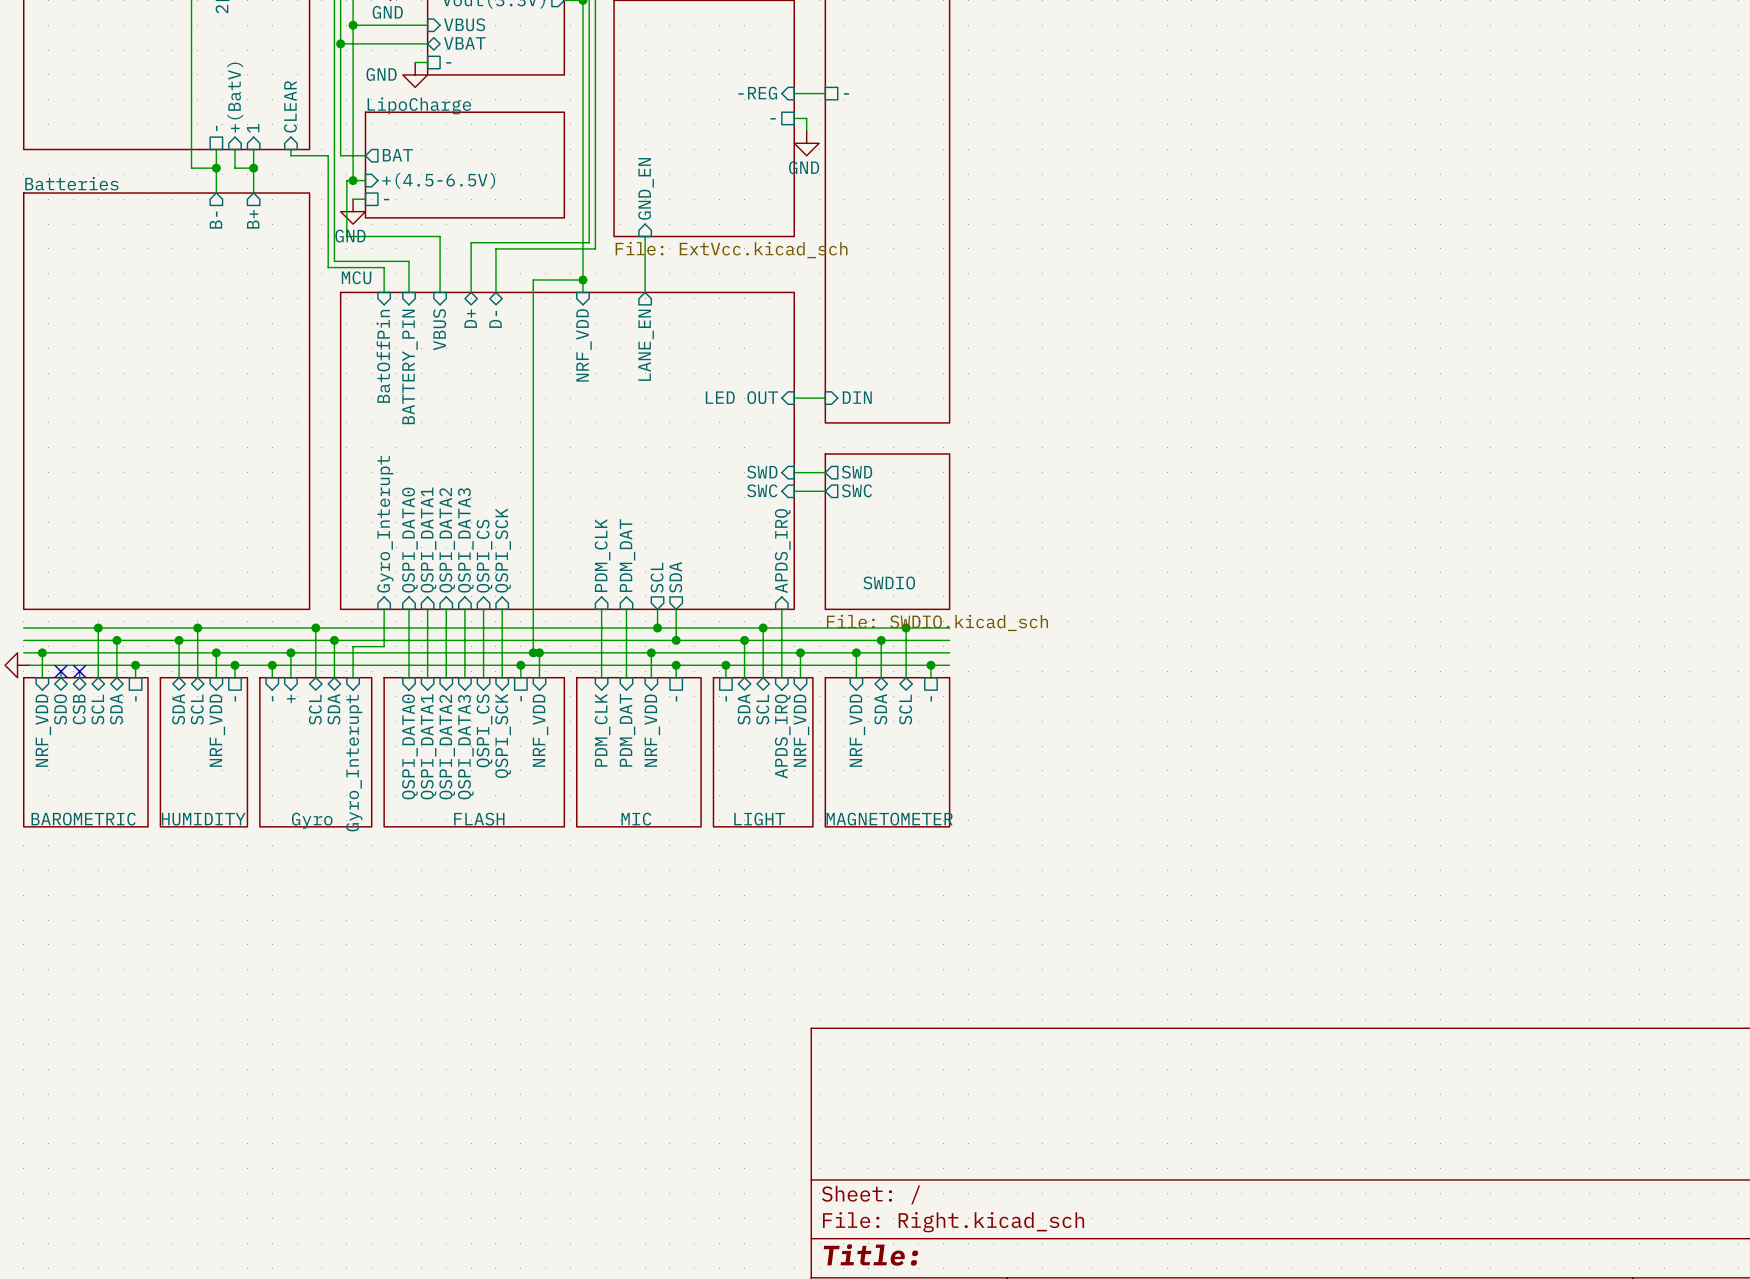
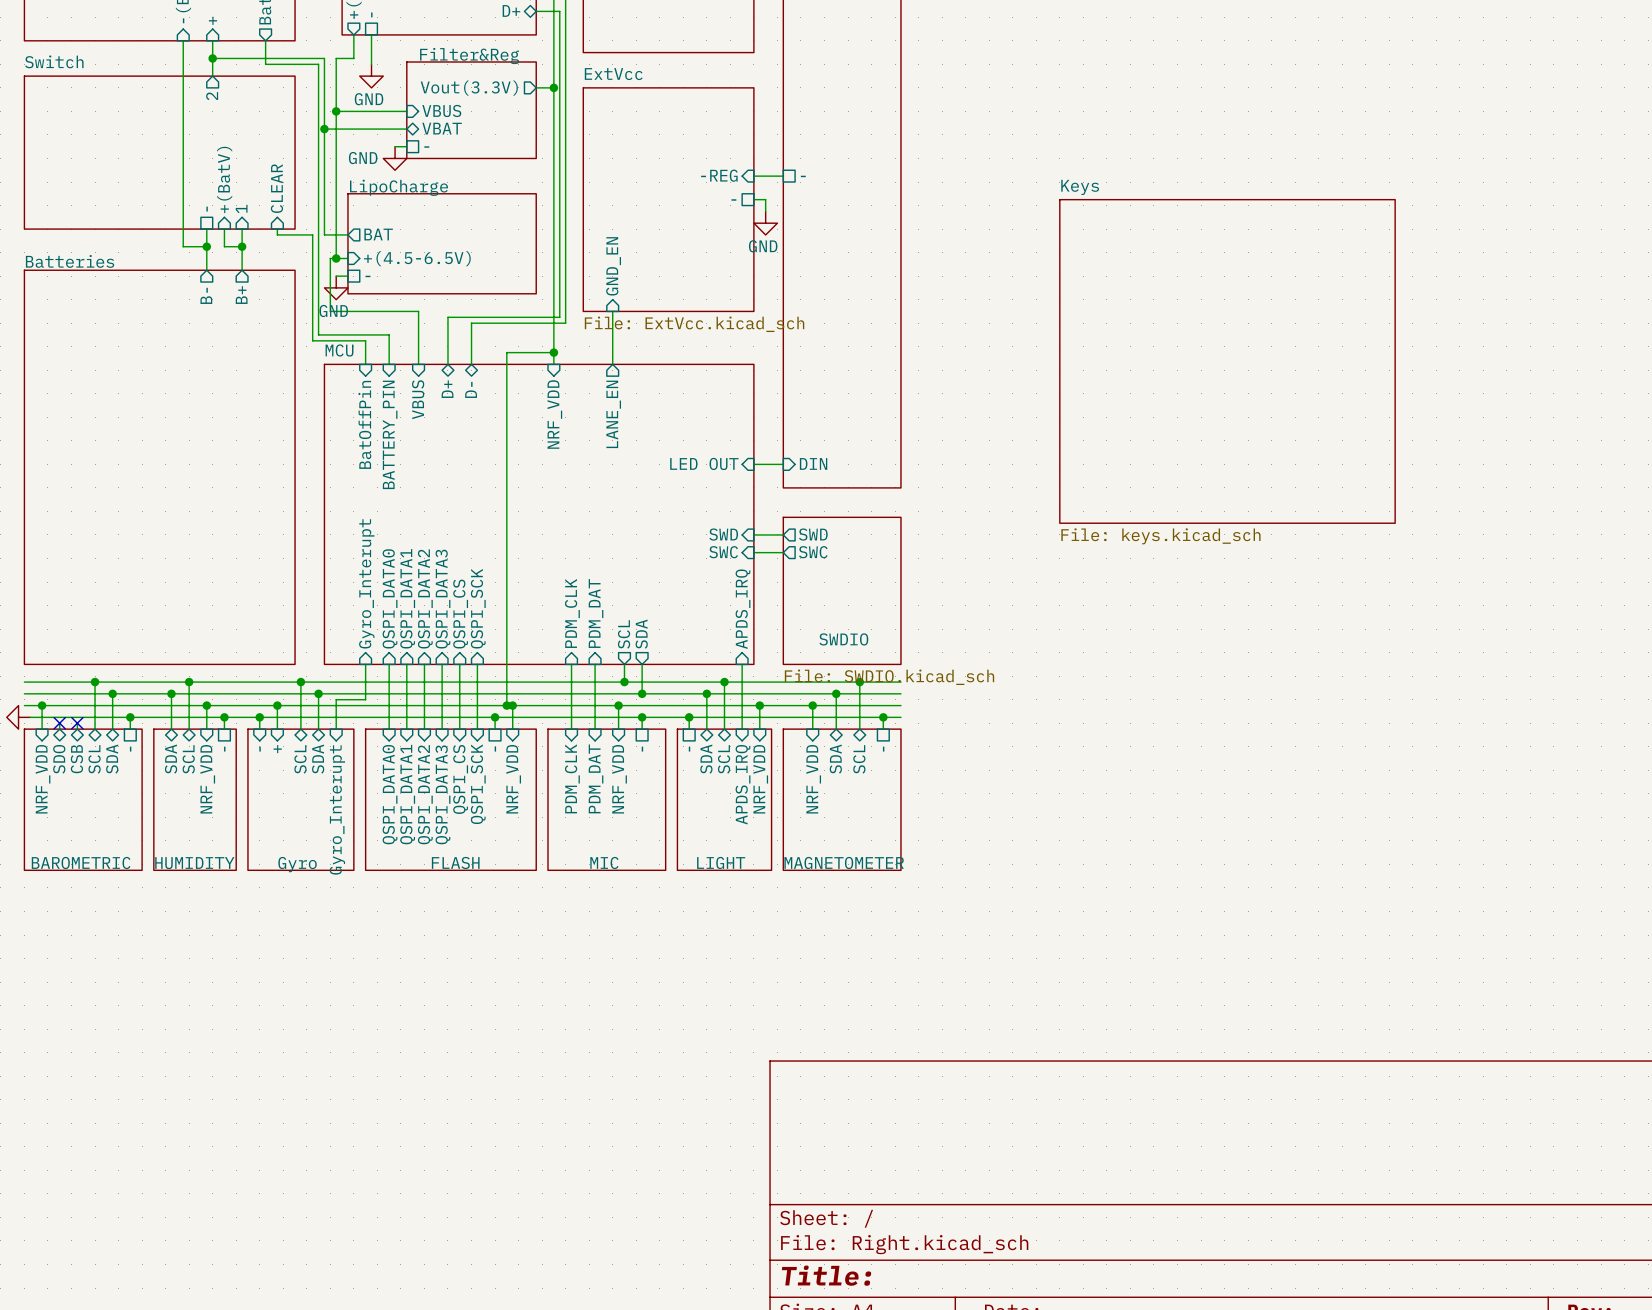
sheet Keys: none -> File: keys.kicad_sch (1227, 361)

